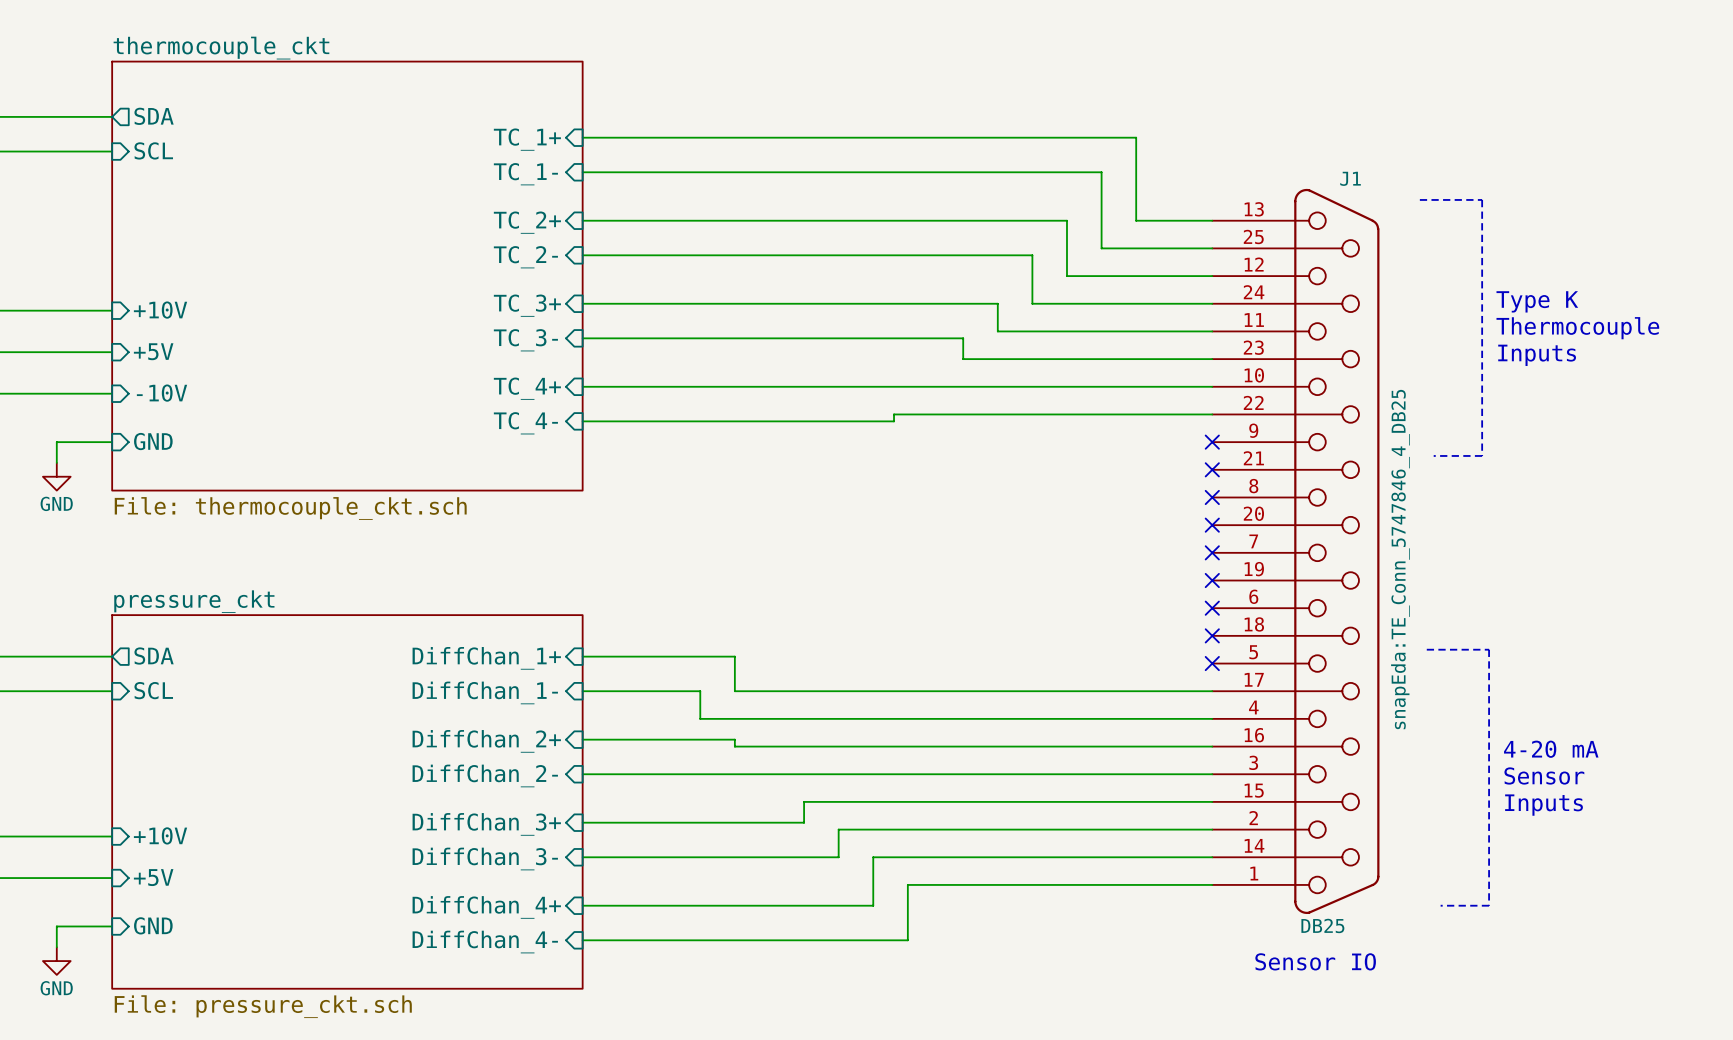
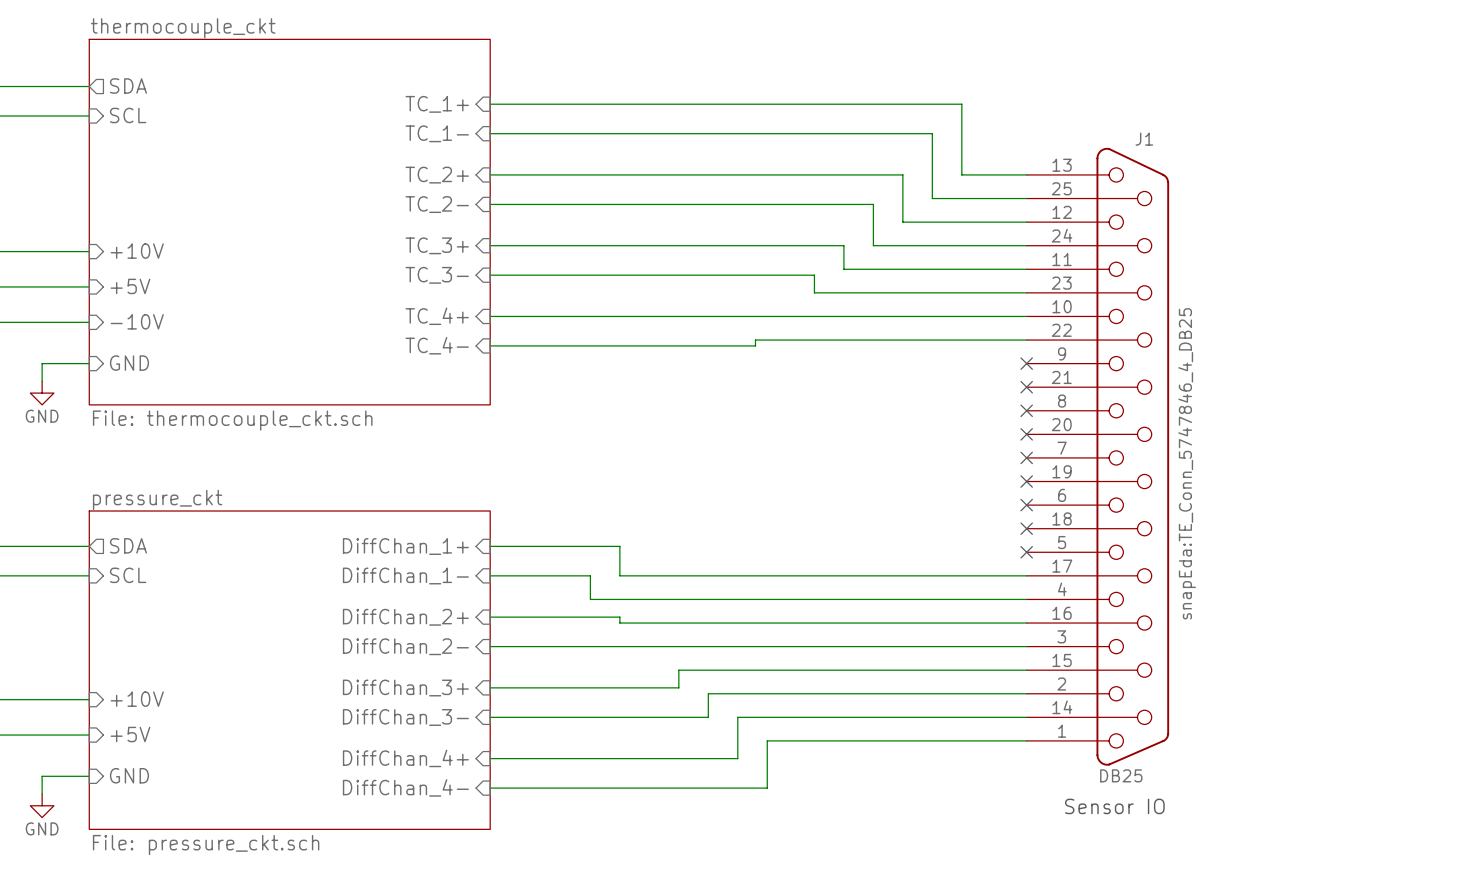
line: (1419, 199) (1482, 199) (1482, 455) (1433, 455) -> none
text: Type K (1537, 301) -> none
text: Thermocouple (1577, 328) -> none
text: Inputs (1537, 355) -> none
line: (1426, 649) (1489, 649) (1489, 905) (1440, 905) -> none
text: 4-20 mA (1551, 749) -> none
text: Sensor (1544, 775) -> none
text: Inputs (1544, 805) -> none

